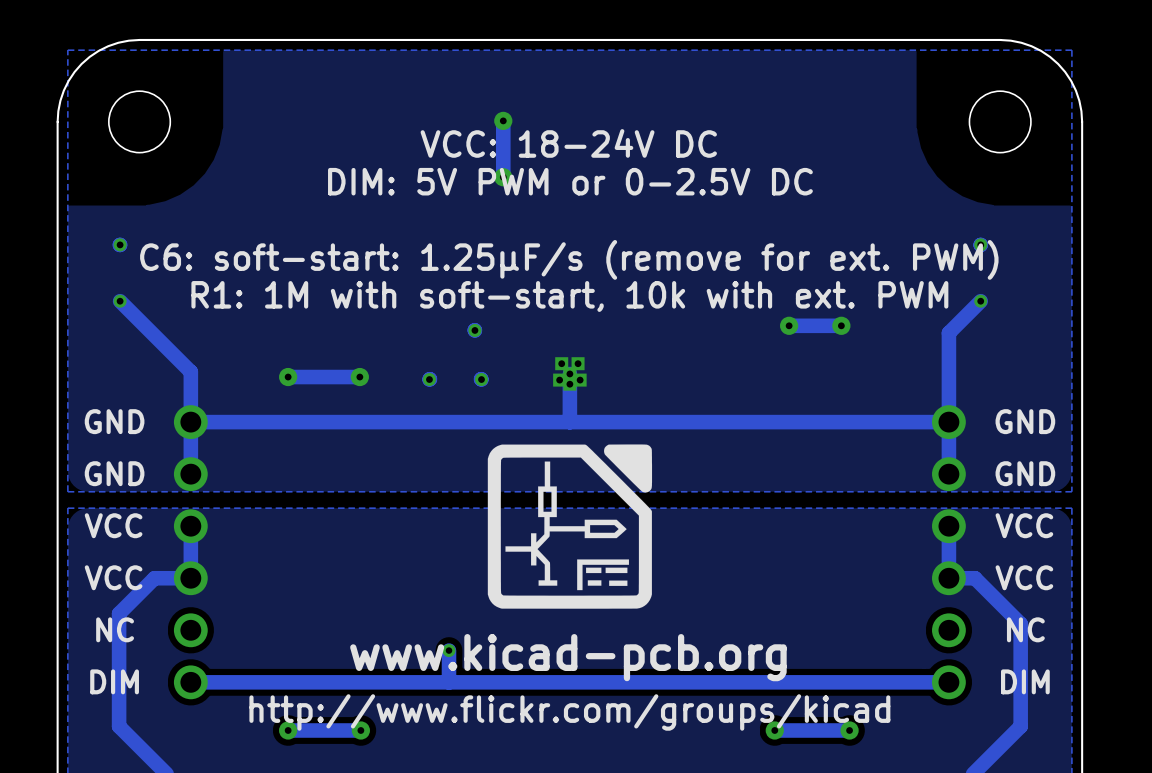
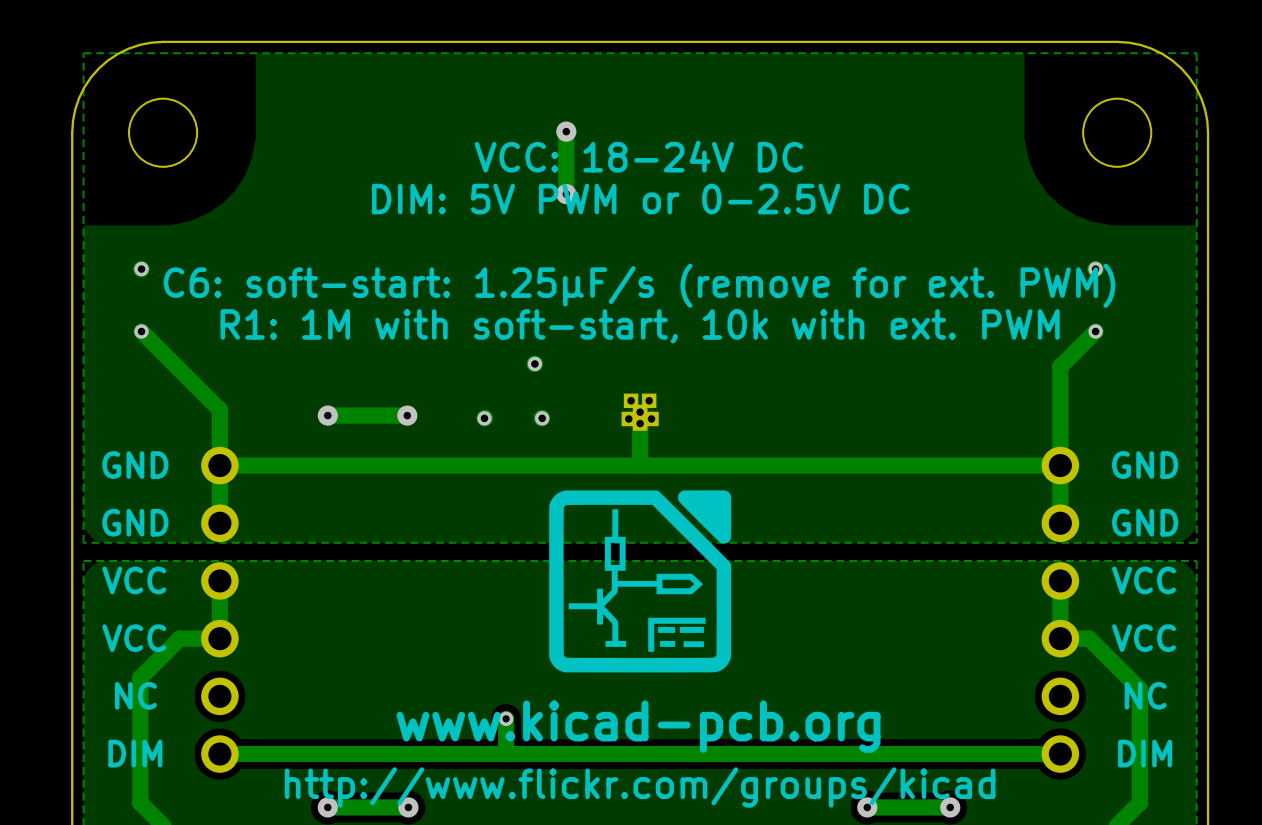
via: (789, 325) -> none
track: (841, 325) (789, 325) -> none
via: (841, 325) -> none

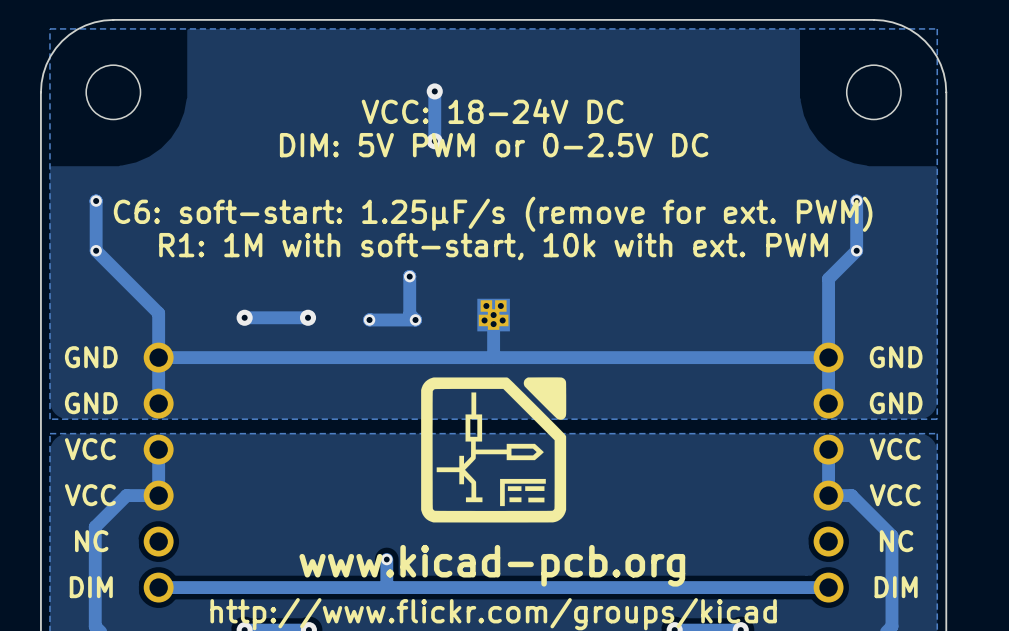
track: none -> (96, 201) (96, 250)
track: none -> (856, 201) (856, 250)
track: none -> (409, 276) (409, 314) (415, 319)
part footprint: [621, 393, 659, 431] -> [477, 298, 510, 332]
track: none -> (415, 319) (369, 319)

